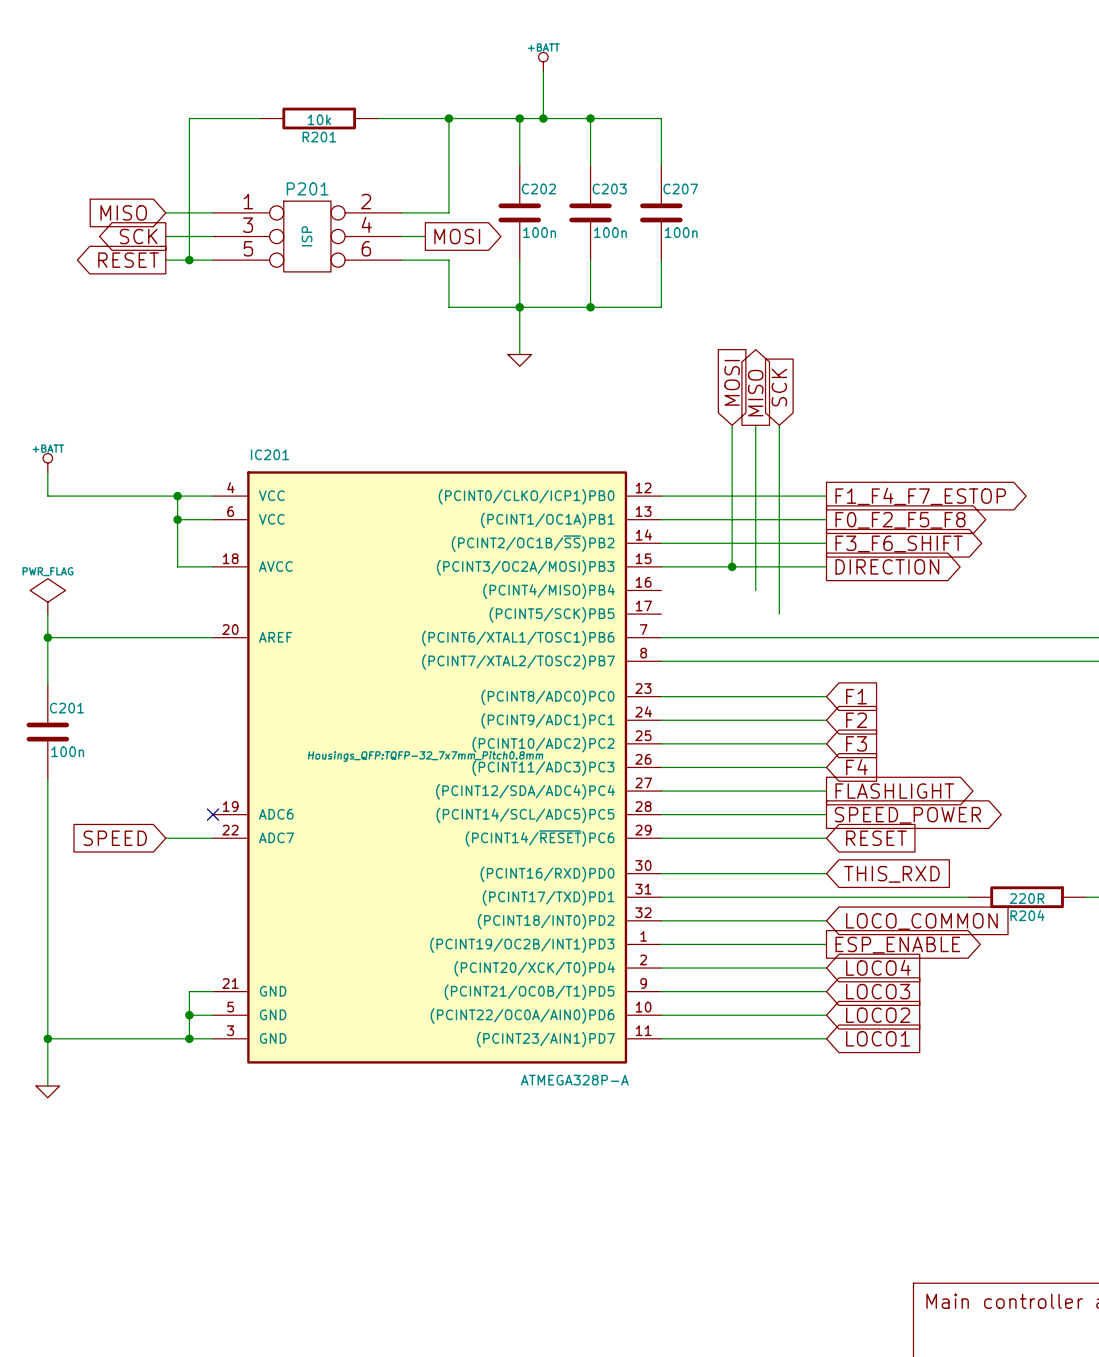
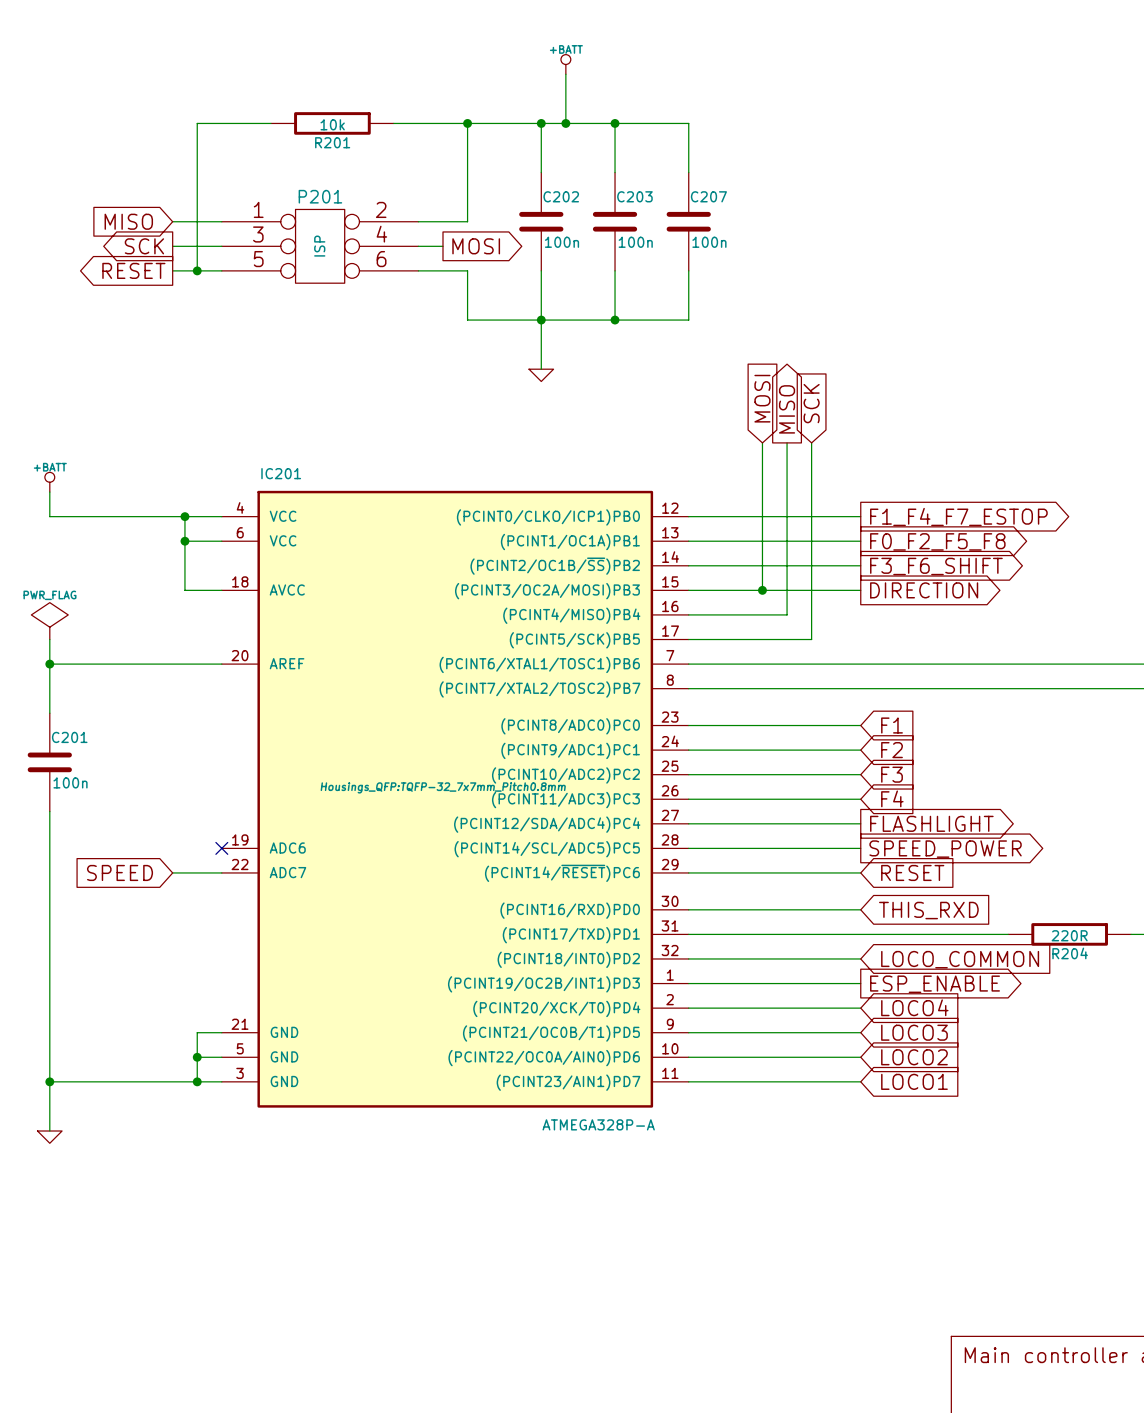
wire: none -> (688, 614) (787, 614)
wire: none -> (688, 639) (811, 639)

